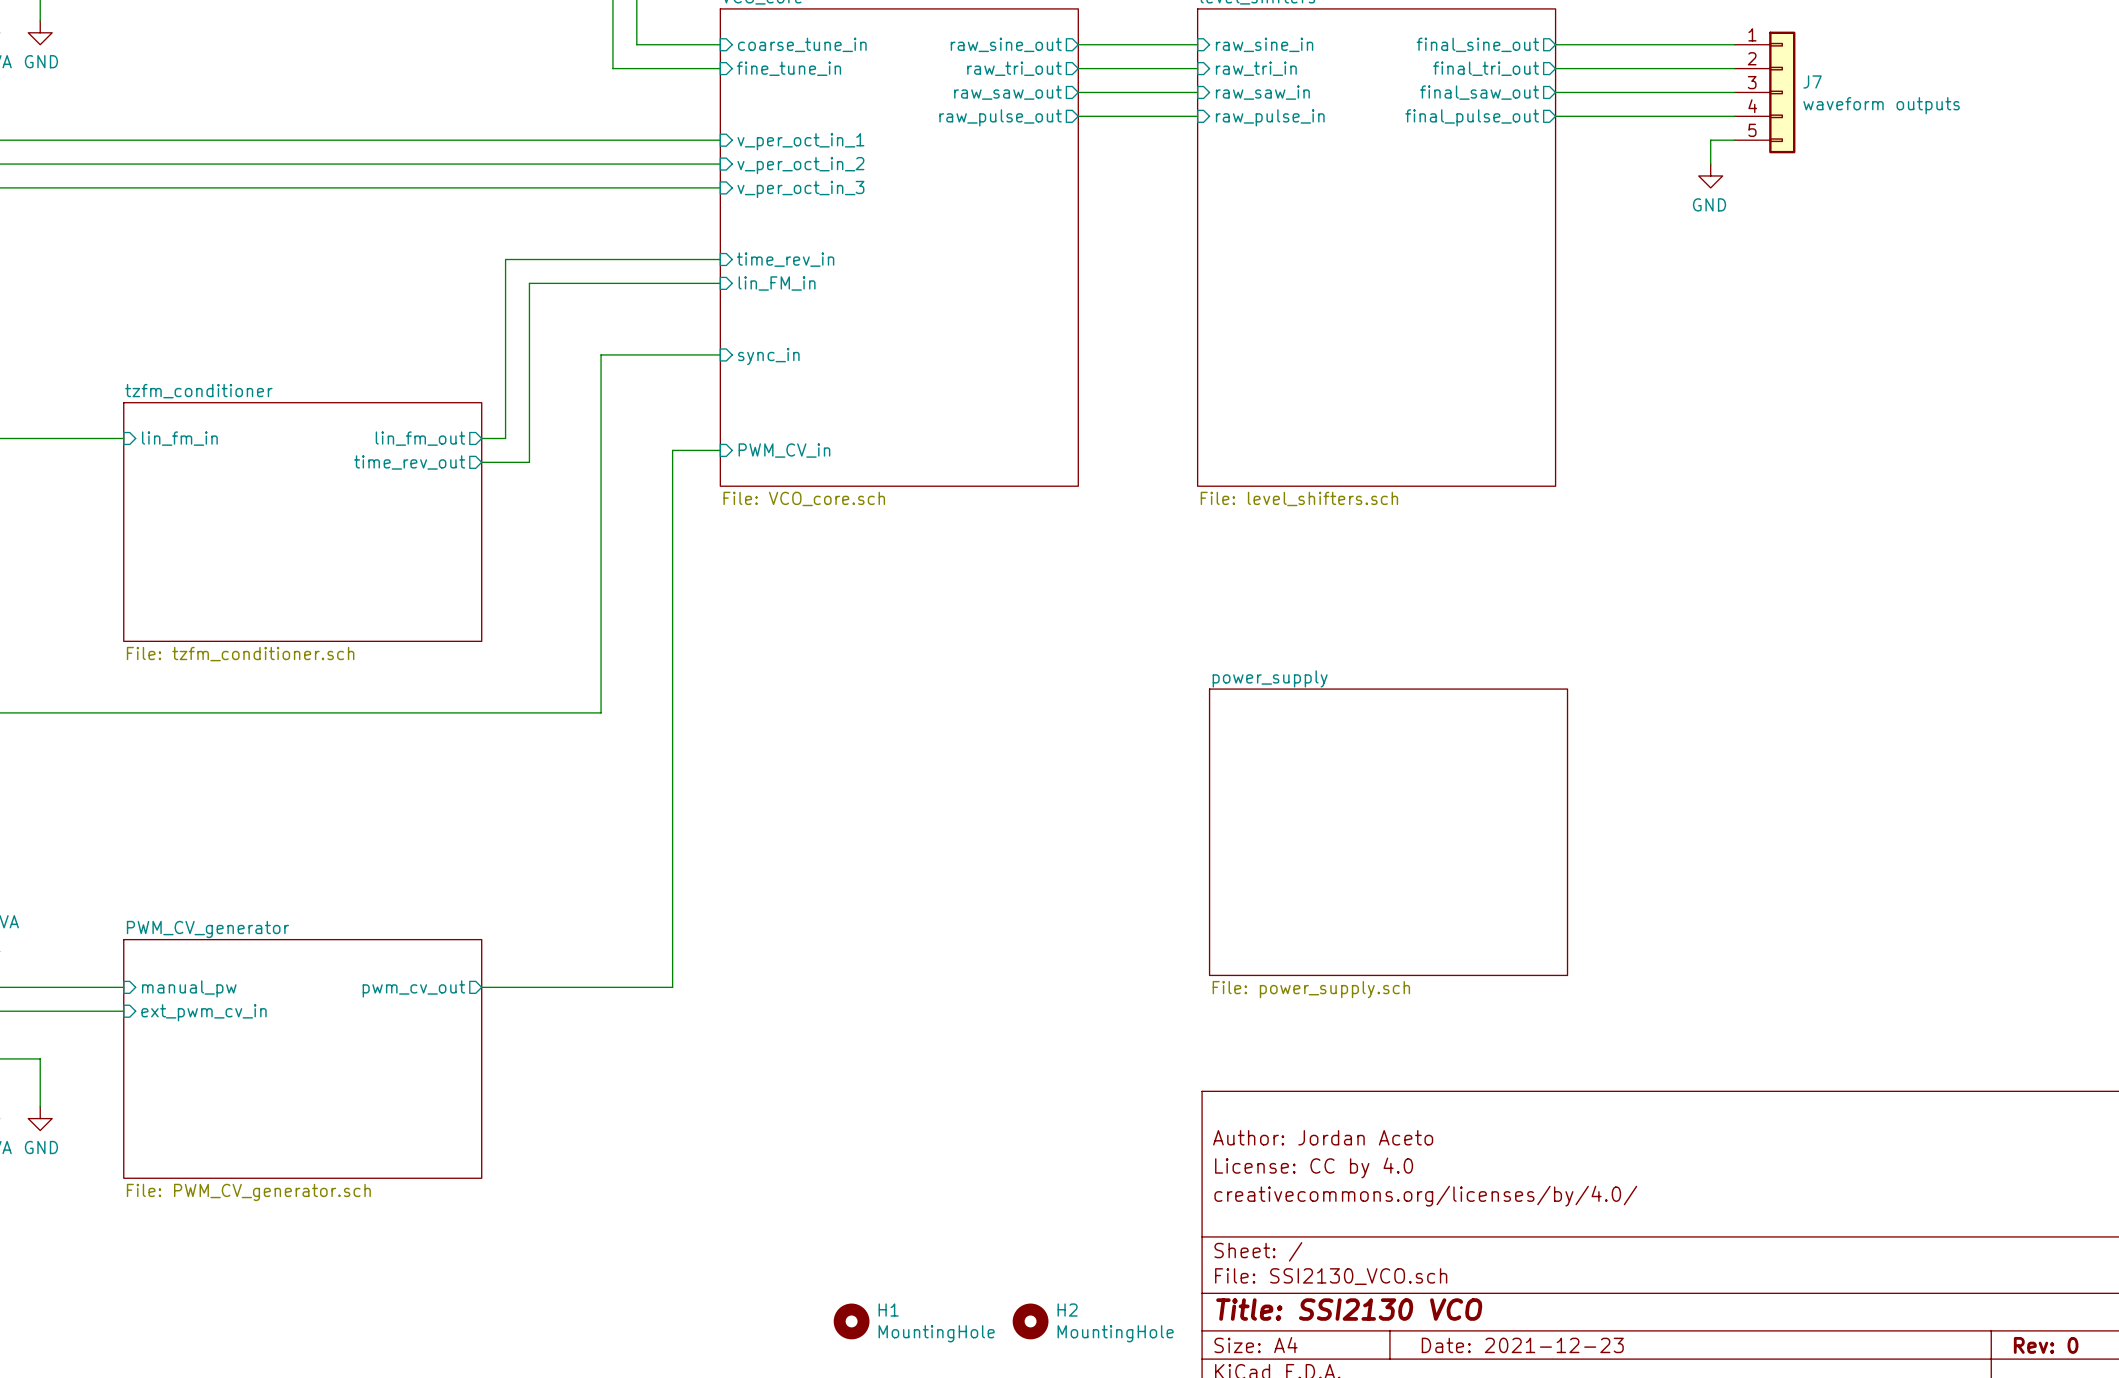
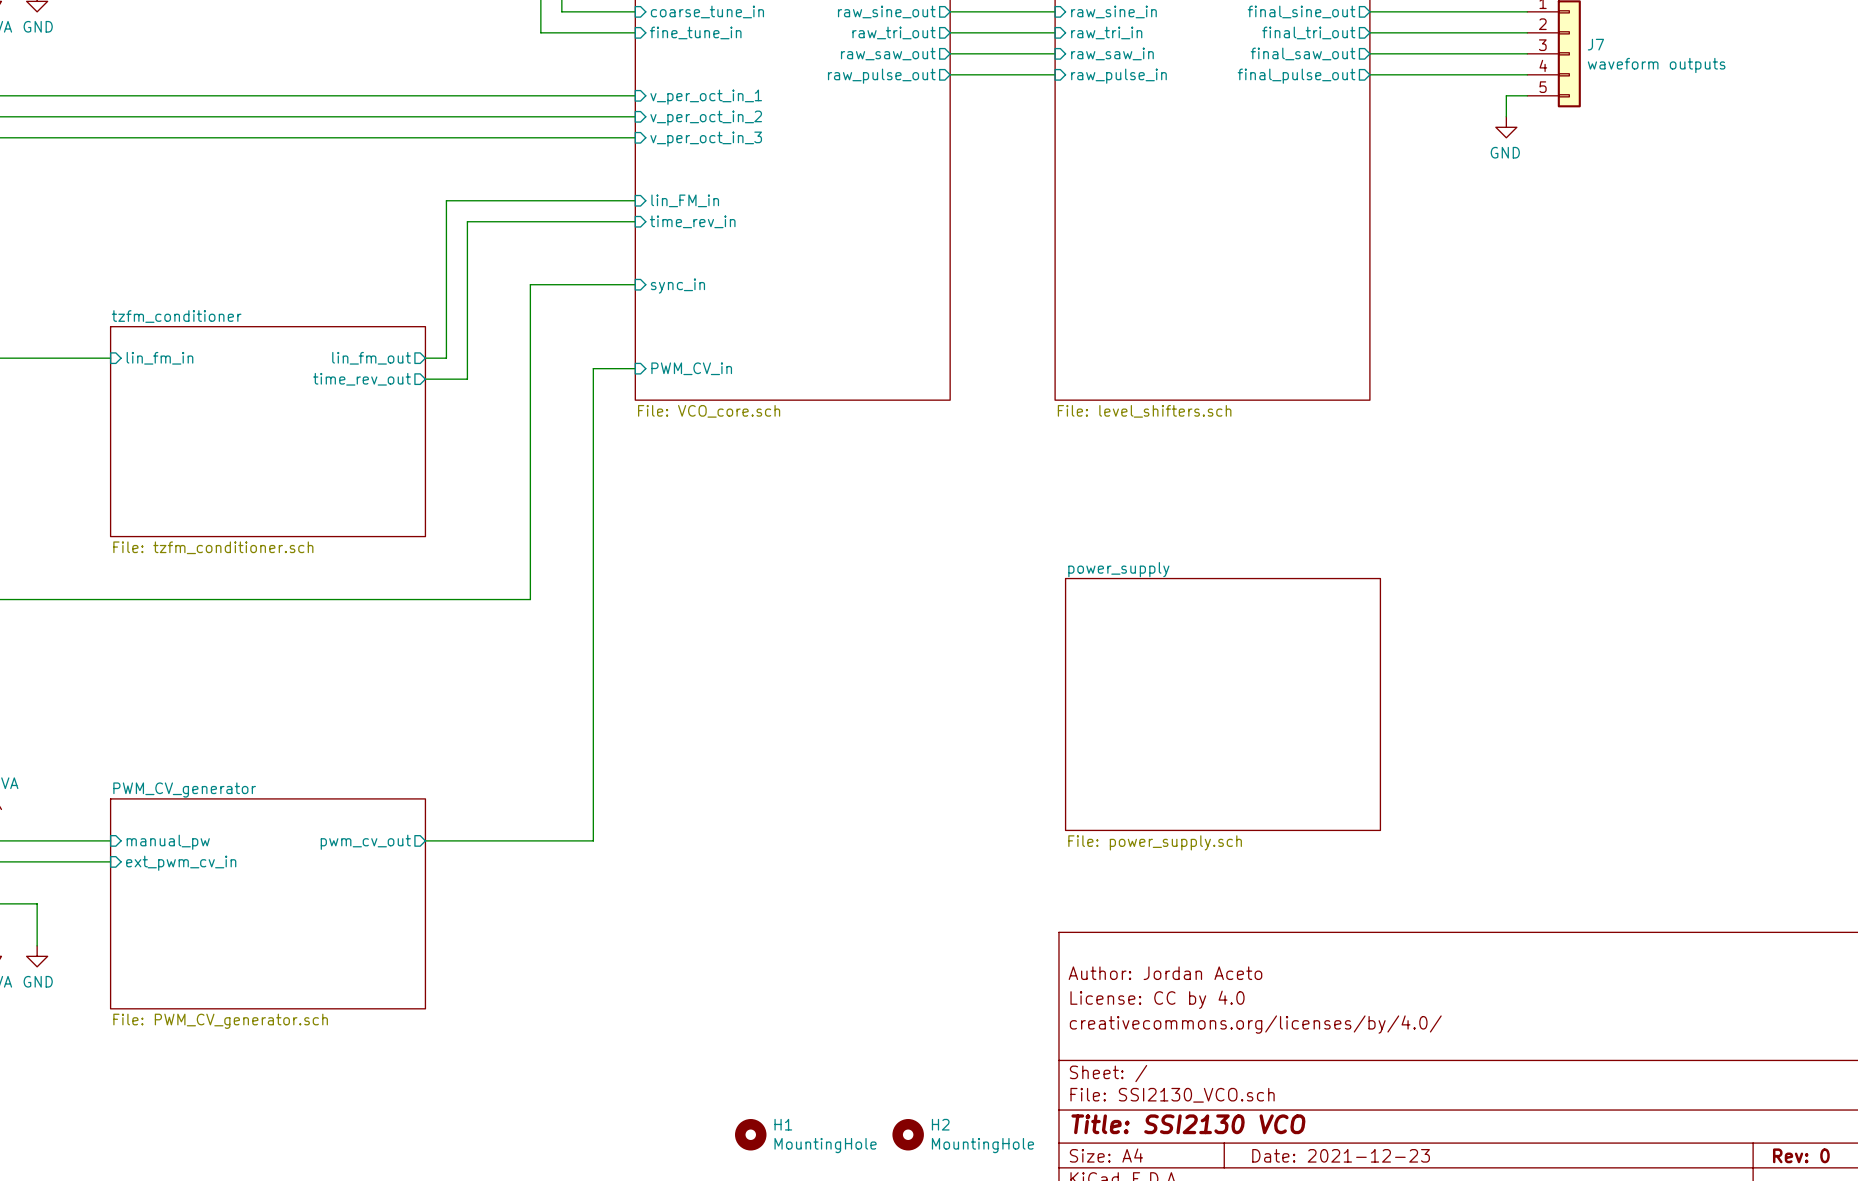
sheet pin: time_rev_in (785, 259) -> lin_FM_in (685, 200)
sheet pin: lin_FM_in (777, 283) -> time_rev_in (692, 221)

